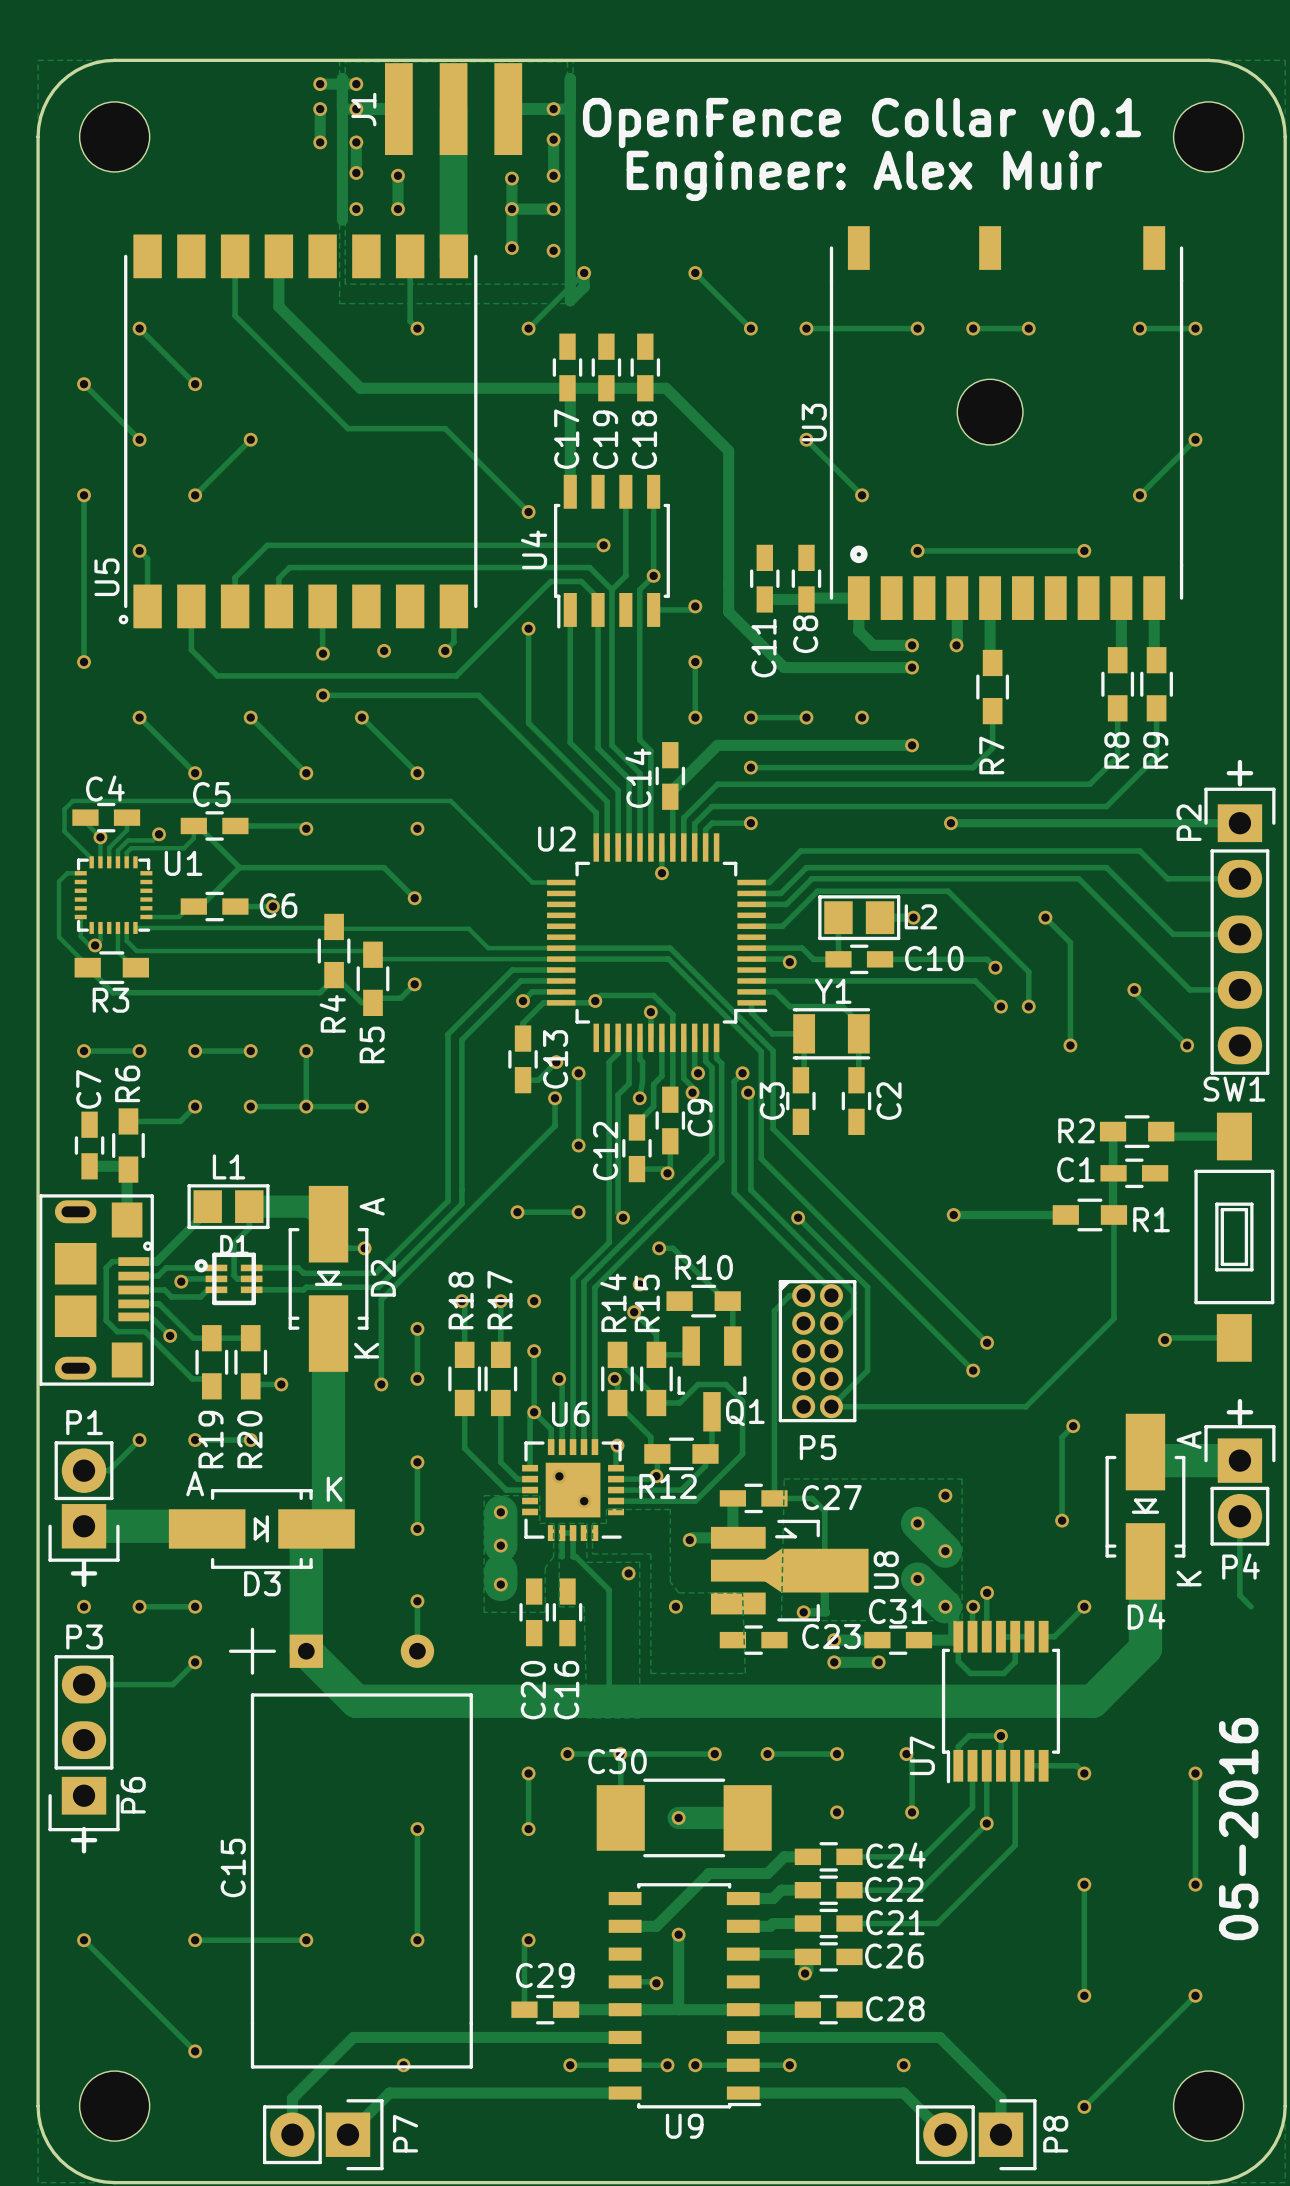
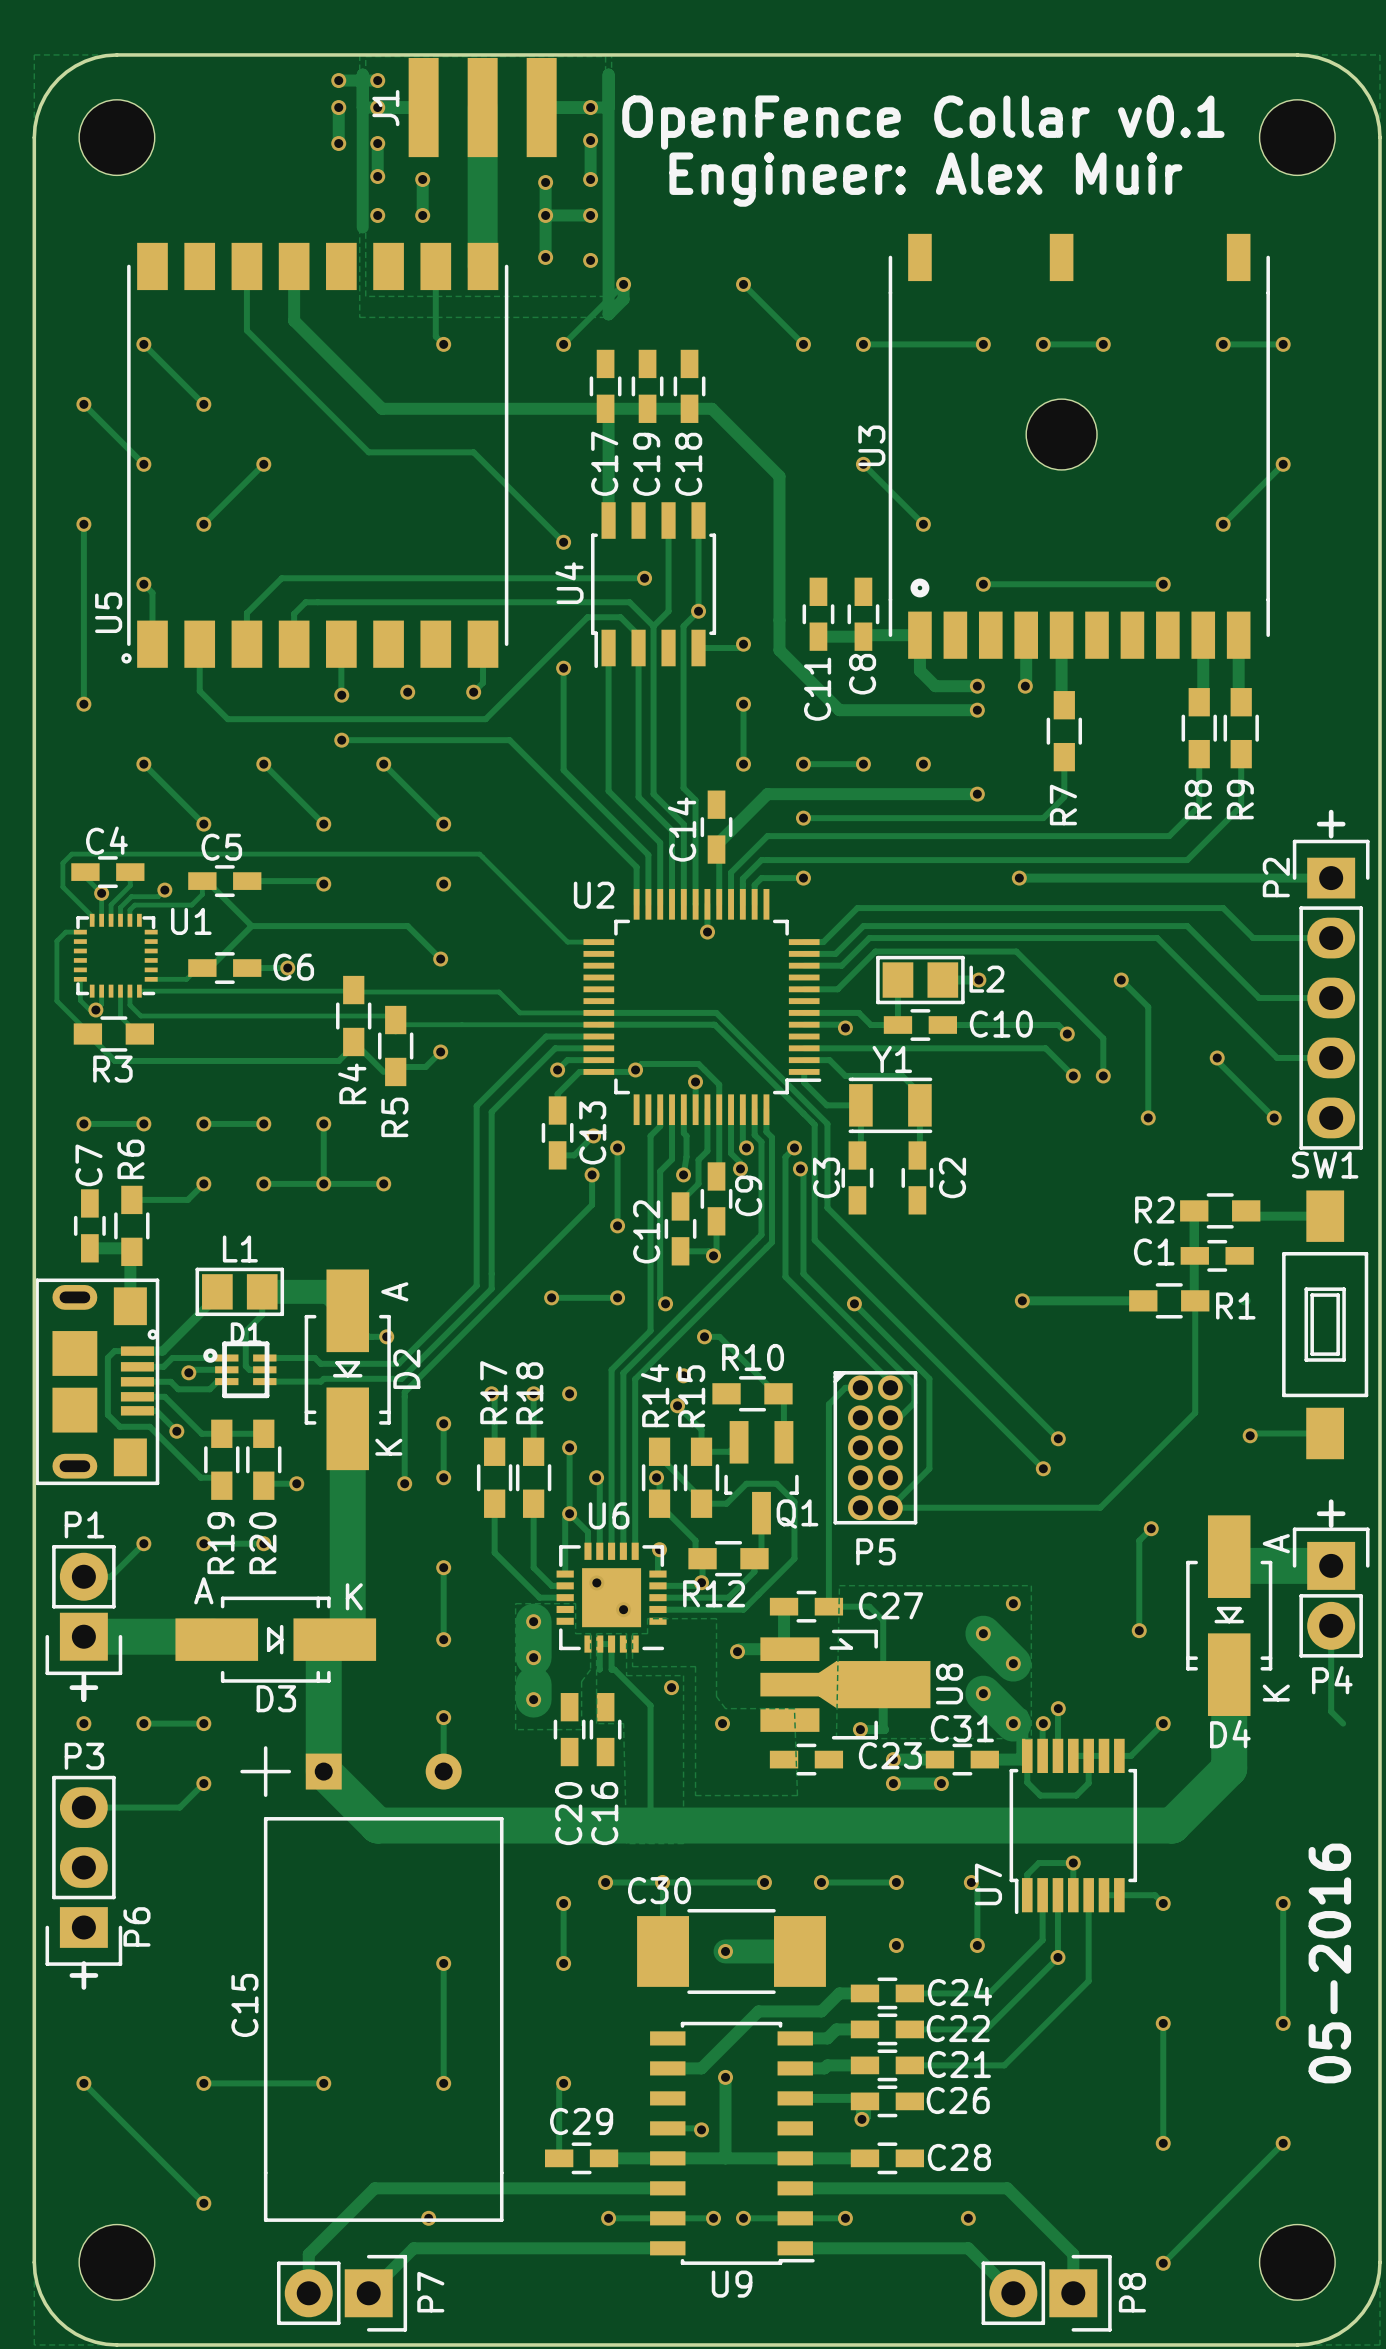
R18 name: R18 (461, 1300) -> R17 (493, 1392)
R17 name: R17 (499, 1300) -> R18 (529, 1393)

